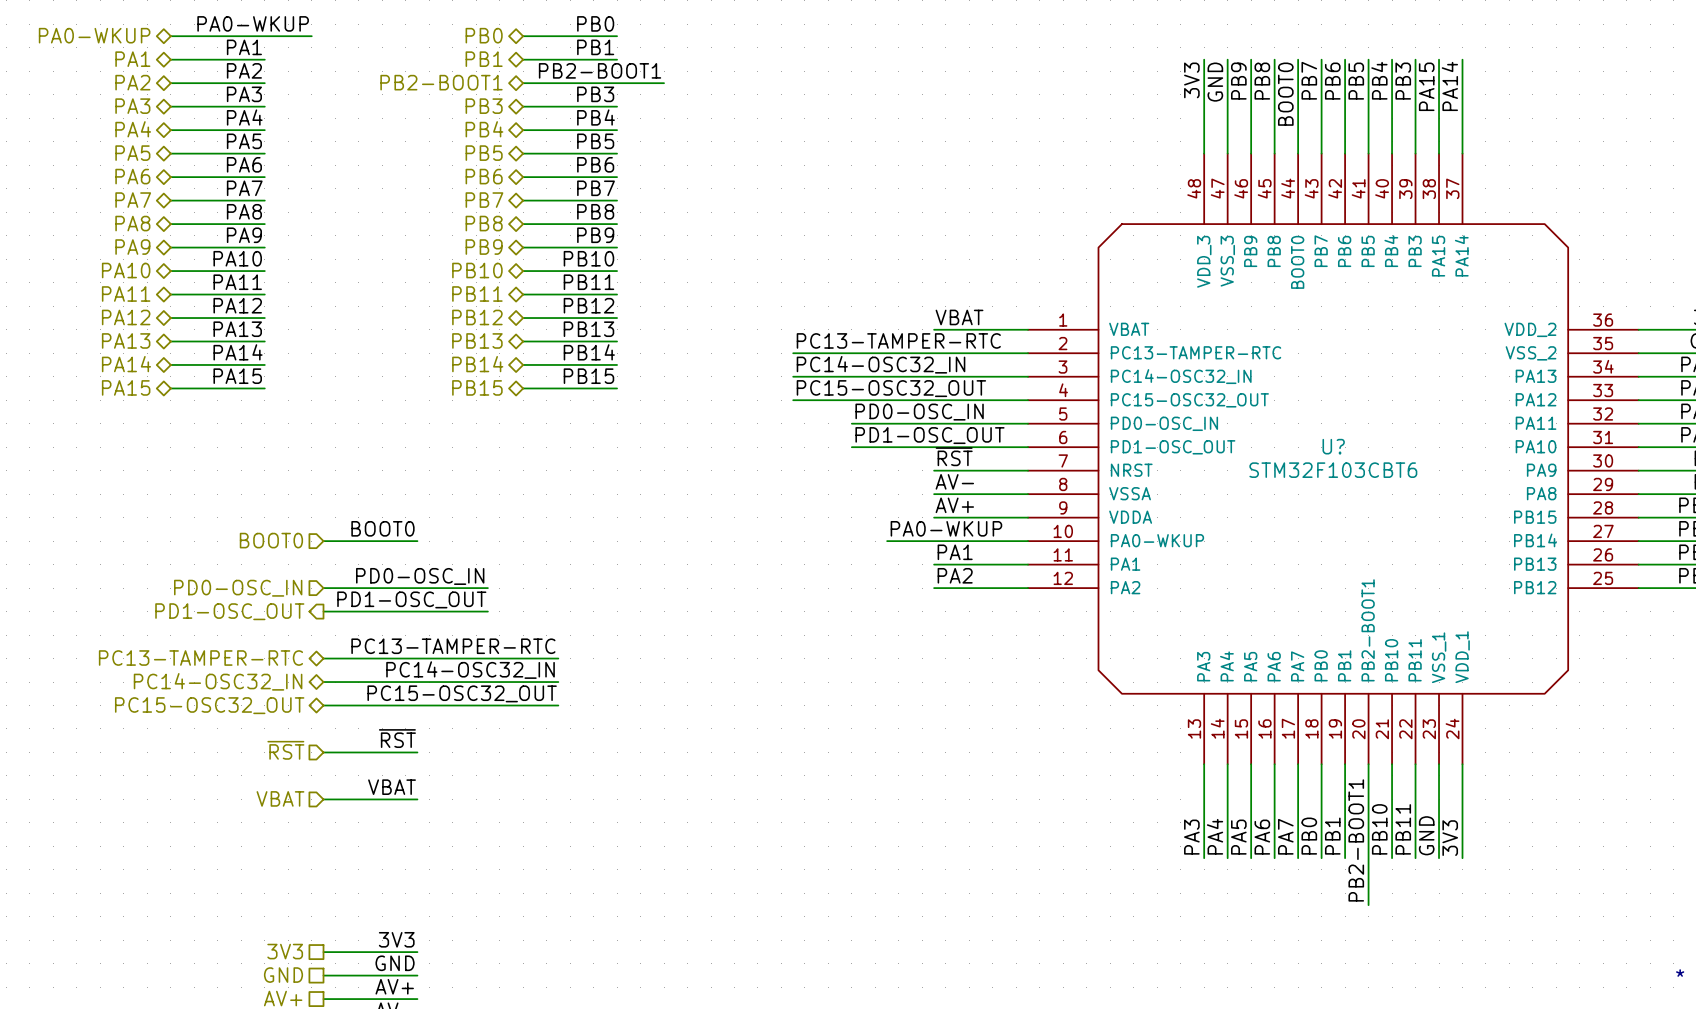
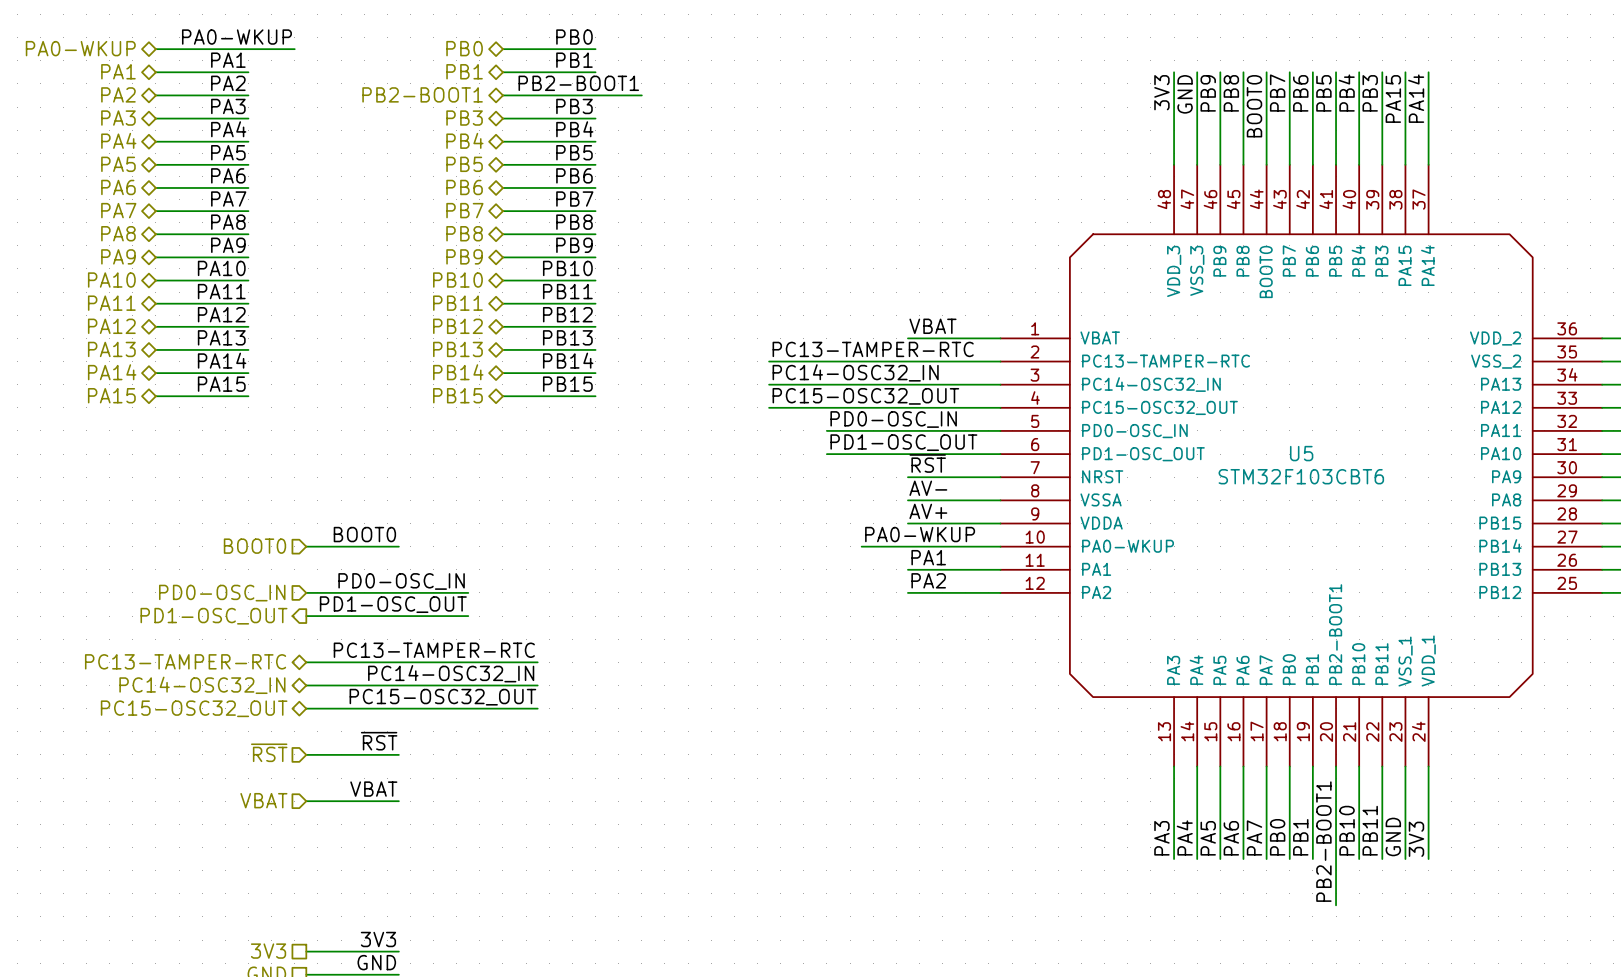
U? name: U? (1333, 446) -> U5 (1301, 453)

